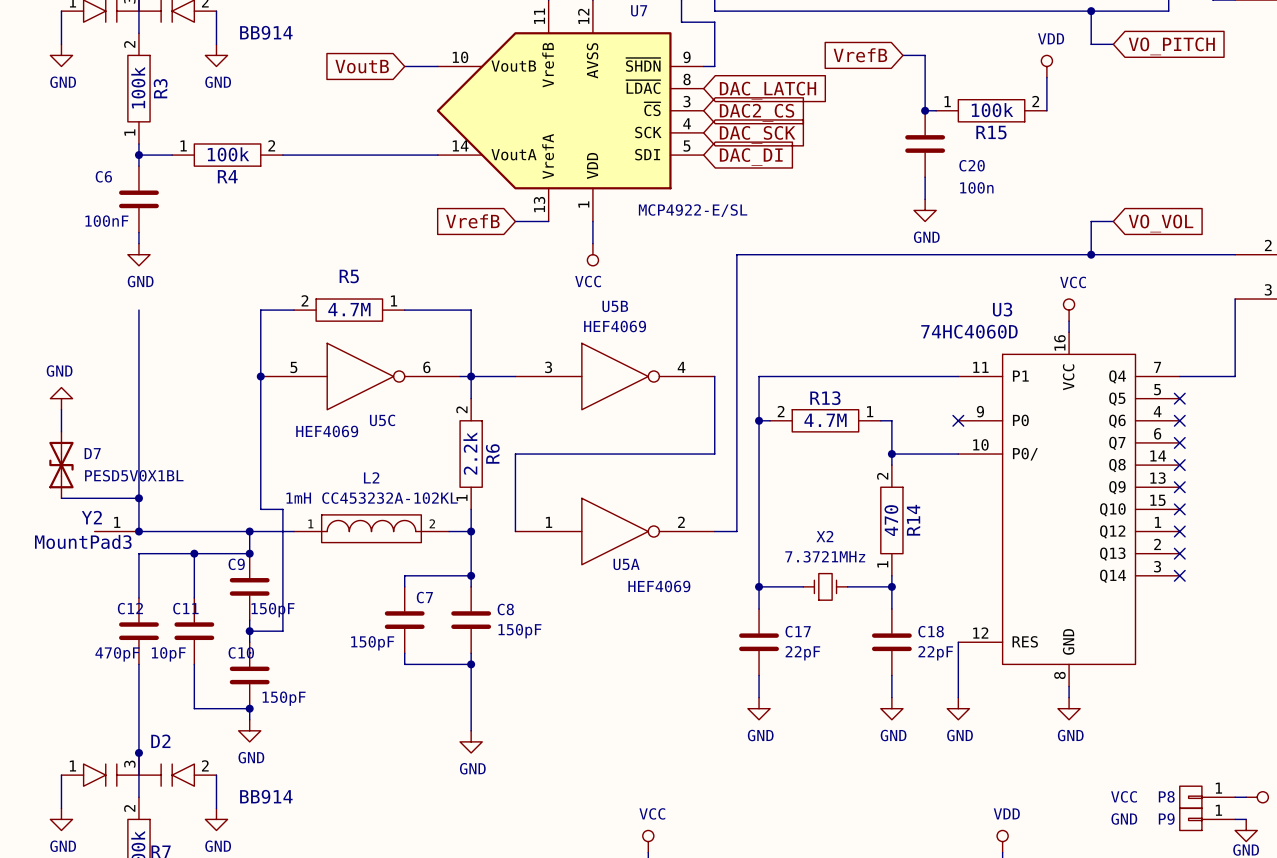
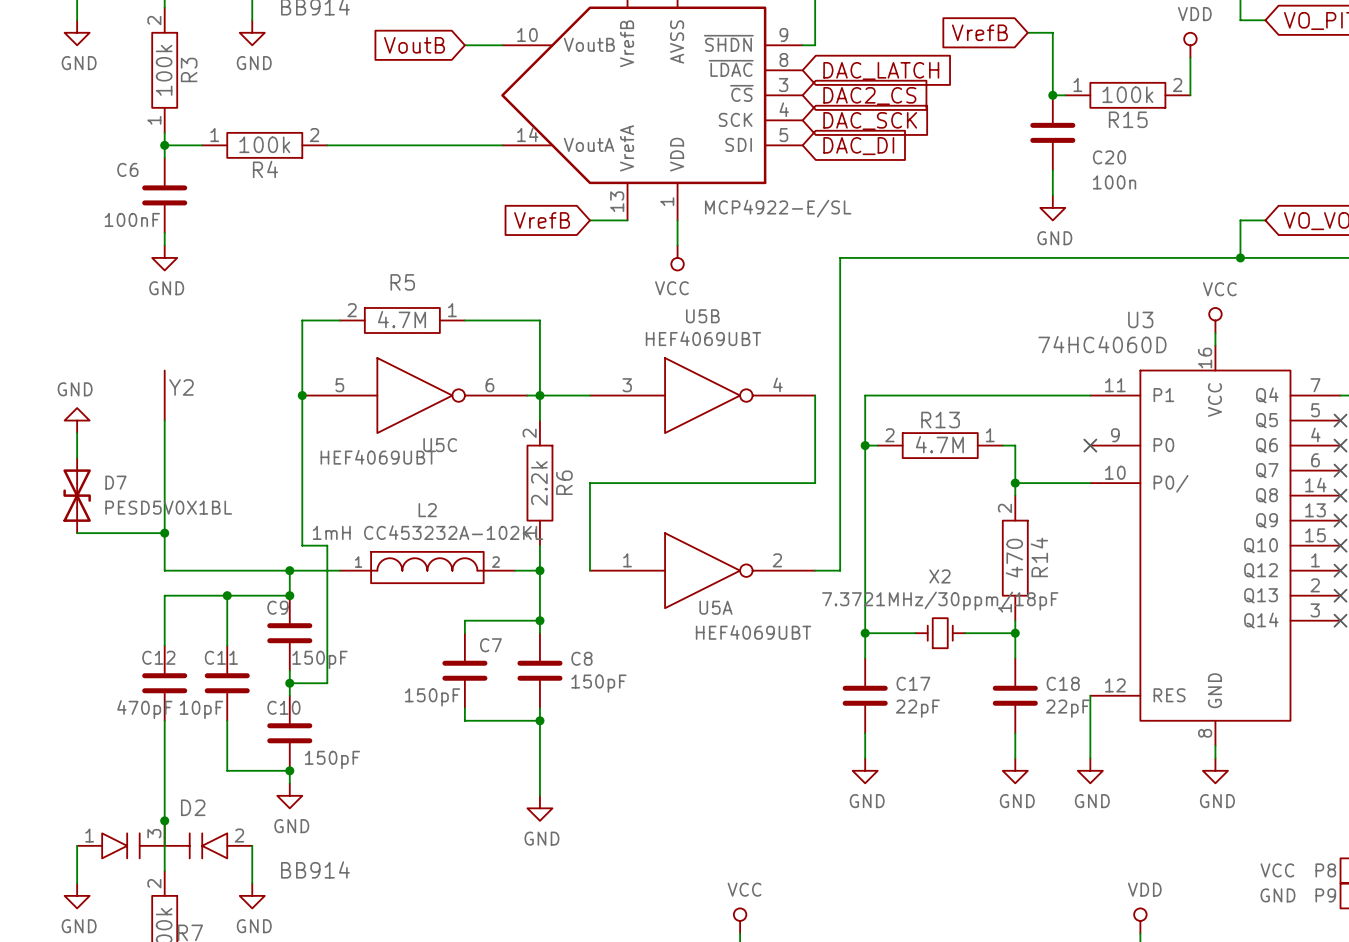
wire: (138, 310) (138, 398) -> none
U5B value: HEF4069 (615, 326) -> HEF4069UBT (703, 338)
U5C value: HEF4069 (327, 431) -> HEF4069UBT (378, 457)
Y2 name position: Y2 (91, 517) -> Y2 (181, 387)
Y2 symbol: [94, 531, 139, 532] -> [164, 370, 165, 421]
junction: (138, 531) -> none
Y2 value: MountPad3 (83, 541) -> none
X2 value: 7.3721MHz (825, 556) -> 7.3721MHz/30ppm/18pF (940, 601)
U5A value: HEF4069 (659, 586) -> HEF4069UBT (753, 632)

